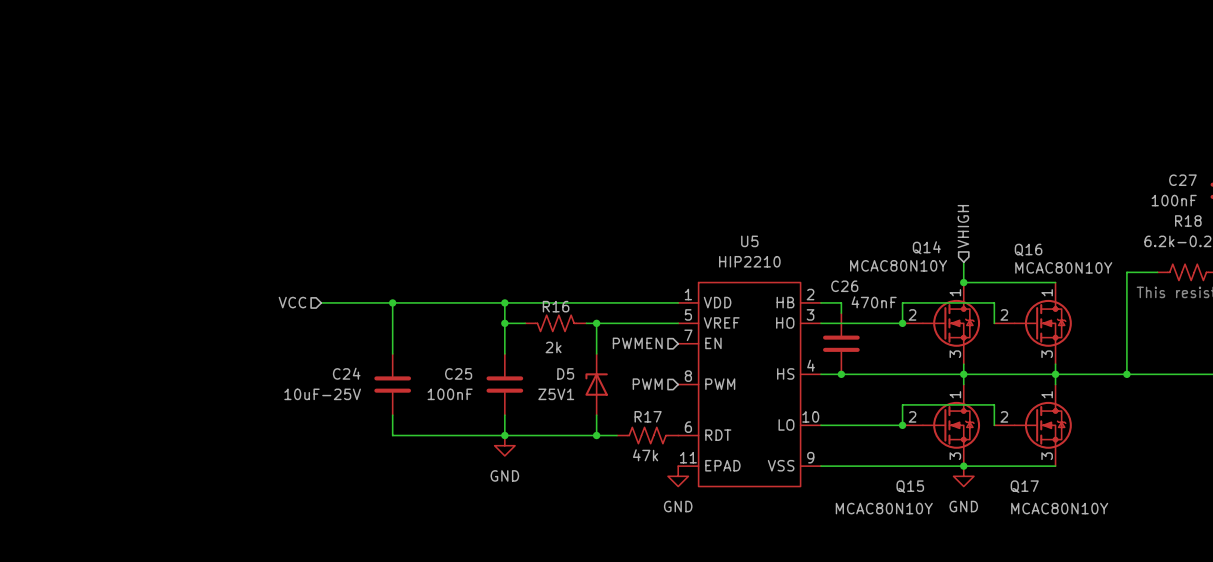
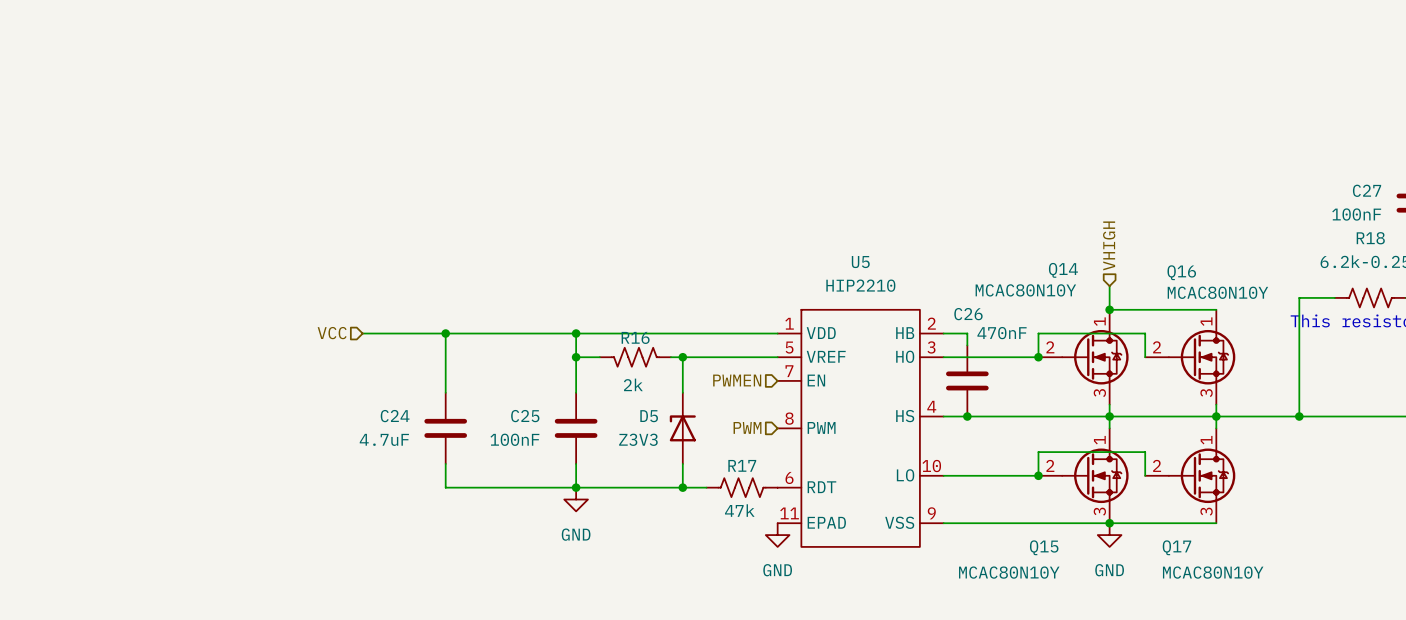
C24 value: 10uF-25V (322, 394) -> 4.7uF (384, 439)
D5 value: Z5V1 (556, 394) -> Z3V3 (638, 439)

